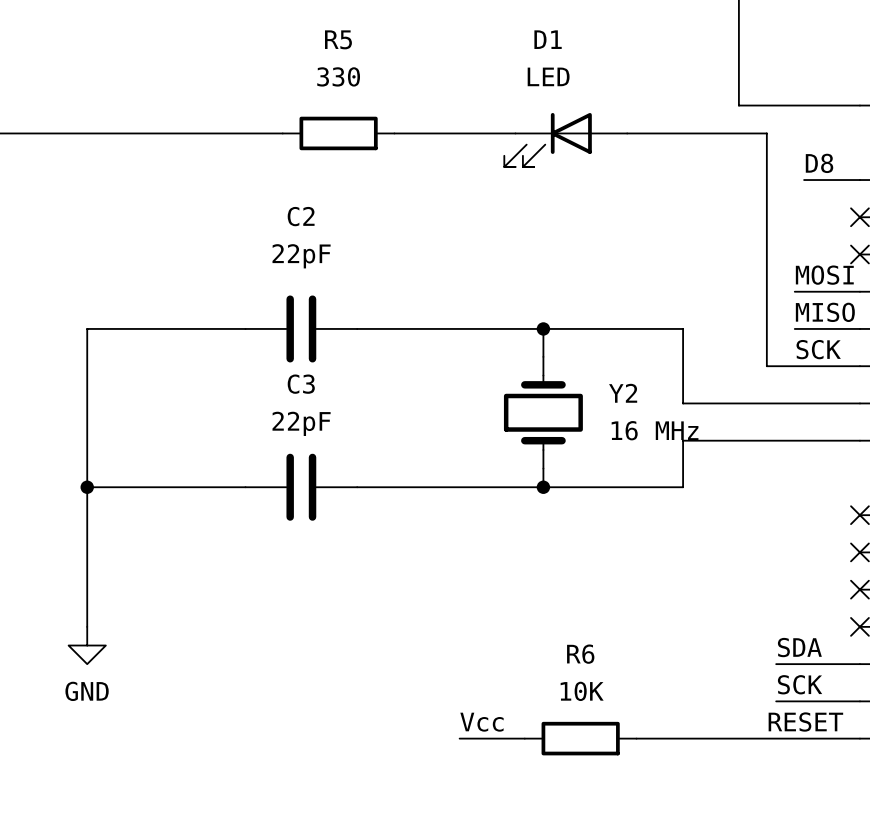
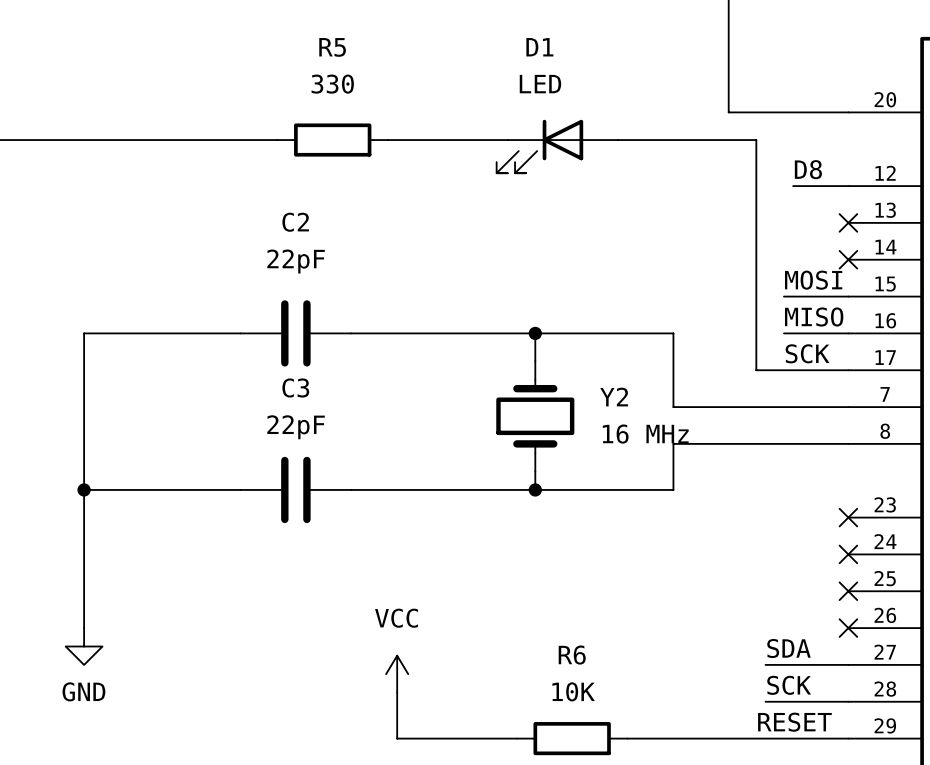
power symbol: none -> VCC (397, 674)
wire: none -> (397, 692) (397, 738) (452, 738)
label: Vcc (481, 722) -> none

